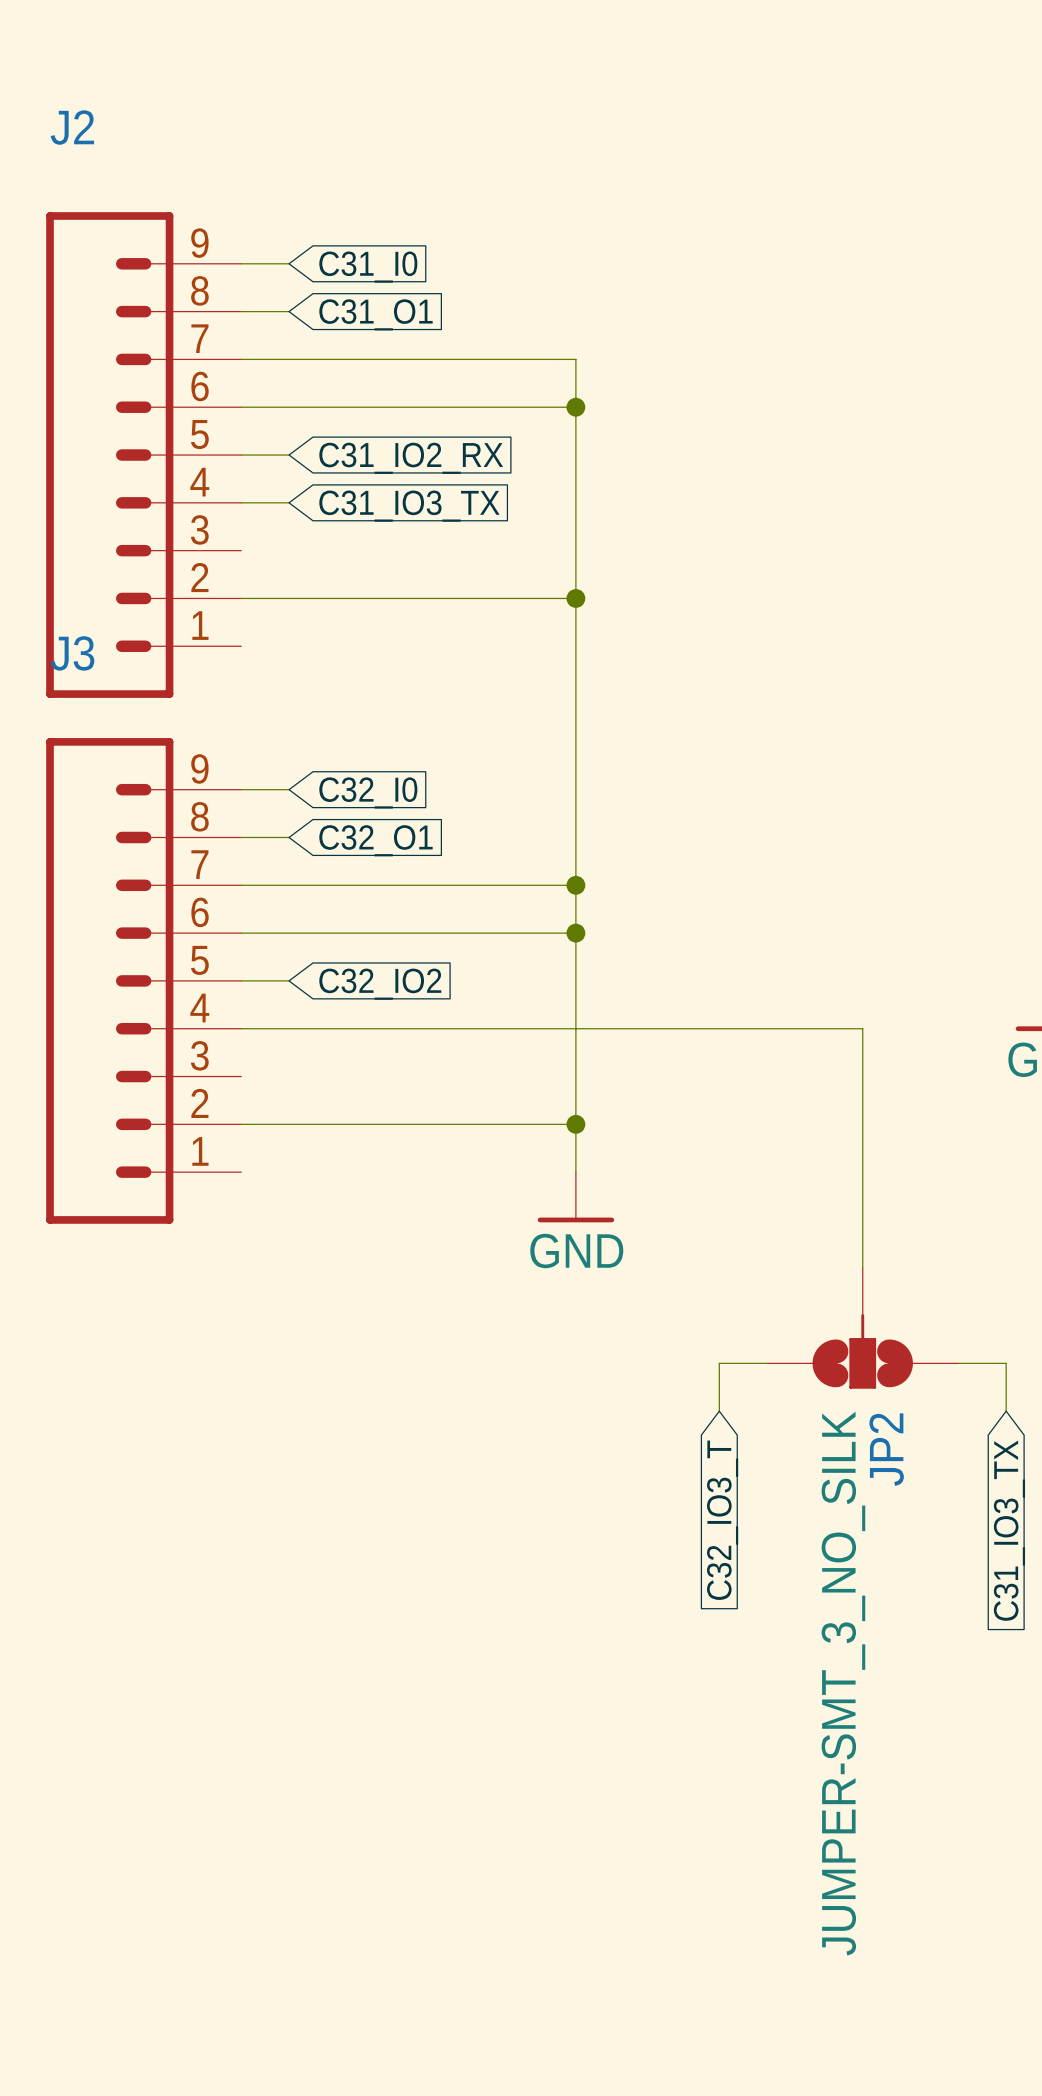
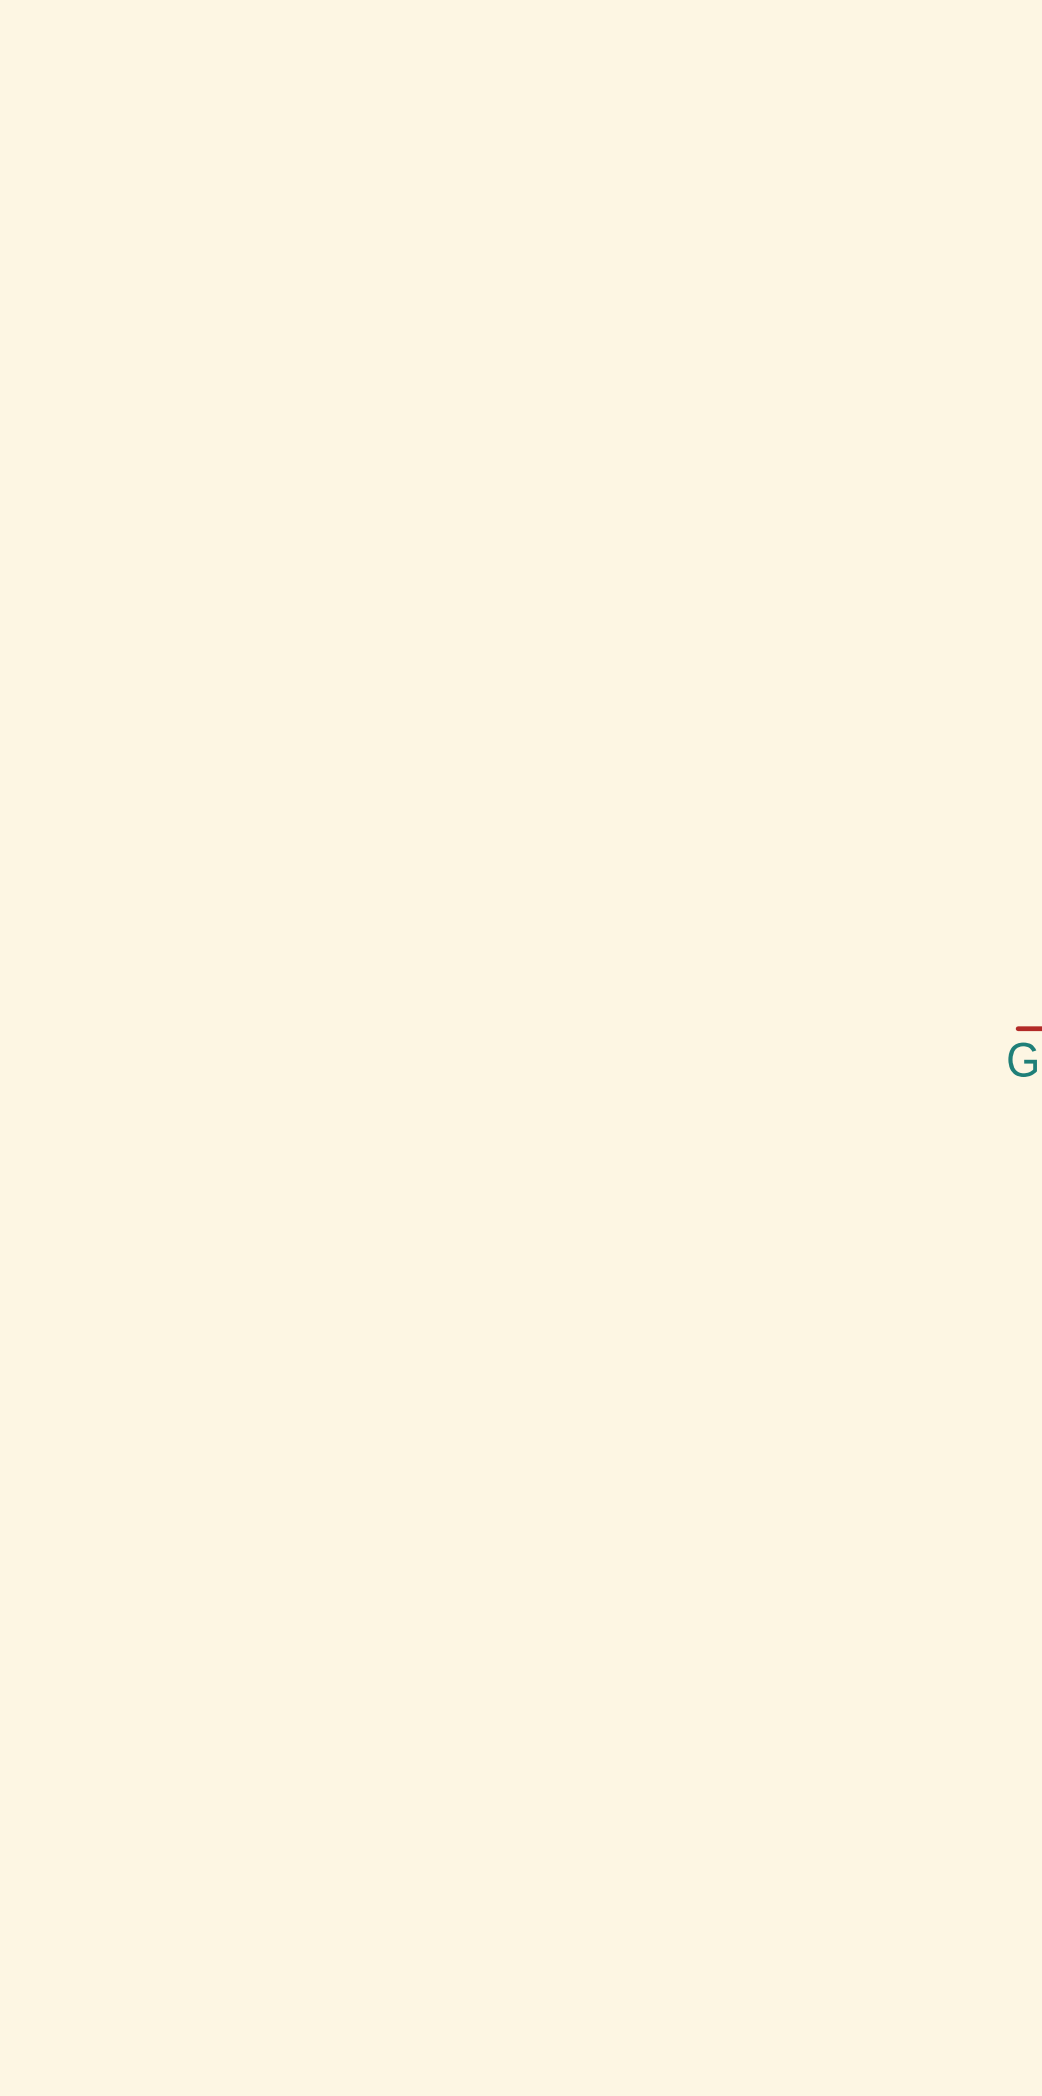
wire: (241, 263) (289, 263) -> none
global label: C31_I0 (368, 267) -> none
wire: (241, 311) (289, 311) -> none
global label: C31_O1 (376, 314) -> none
wire: (241, 359) (575, 359) (575, 1172) -> none
wire: (241, 407) (575, 407) -> none
junction: (575, 407) -> none
J2: (143, 455) -> none
wire: (241, 455) (289, 455) -> none
global label: C31_IO2_RX (411, 458) -> none
wire: (241, 502) (289, 502) -> none
global label: C31_IO3_TX (409, 506) -> none
wire: (241, 598) (575, 598) -> none
junction: (575, 598) -> none
wire: (241, 789) (289, 789) -> none
global label: C32_I0 (368, 792) -> none
wire: (241, 837) (289, 837) -> none
global label: C32_O1 (376, 840) -> none
wire: (241, 885) (575, 885) -> none
junction: (575, 885) -> none
wire: (241, 933) (575, 933) -> none
junction: (575, 933) -> none
J3: (143, 980) -> none
wire: (241, 980) (289, 980) -> none
global label: C32_IO2 (380, 984) -> none
wire: (241, 1028) (862, 1028) (862, 1267) -> none
wire: (241, 1124) (575, 1124) -> none
junction: (575, 1124) -> none
power symbol: GND (575, 1197) -> none
JP2: JUMPER-SMT_3_NO_SILK (862, 1328) -> none
wire: (767, 1363) (719, 1363) (719, 1411) -> none
wire: (958, 1363) (1006, 1363) (1006, 1411) -> none
global label: C32_IO3_T (722, 1520) -> none
global label: C31_IO3_TX (1009, 1530) -> none

